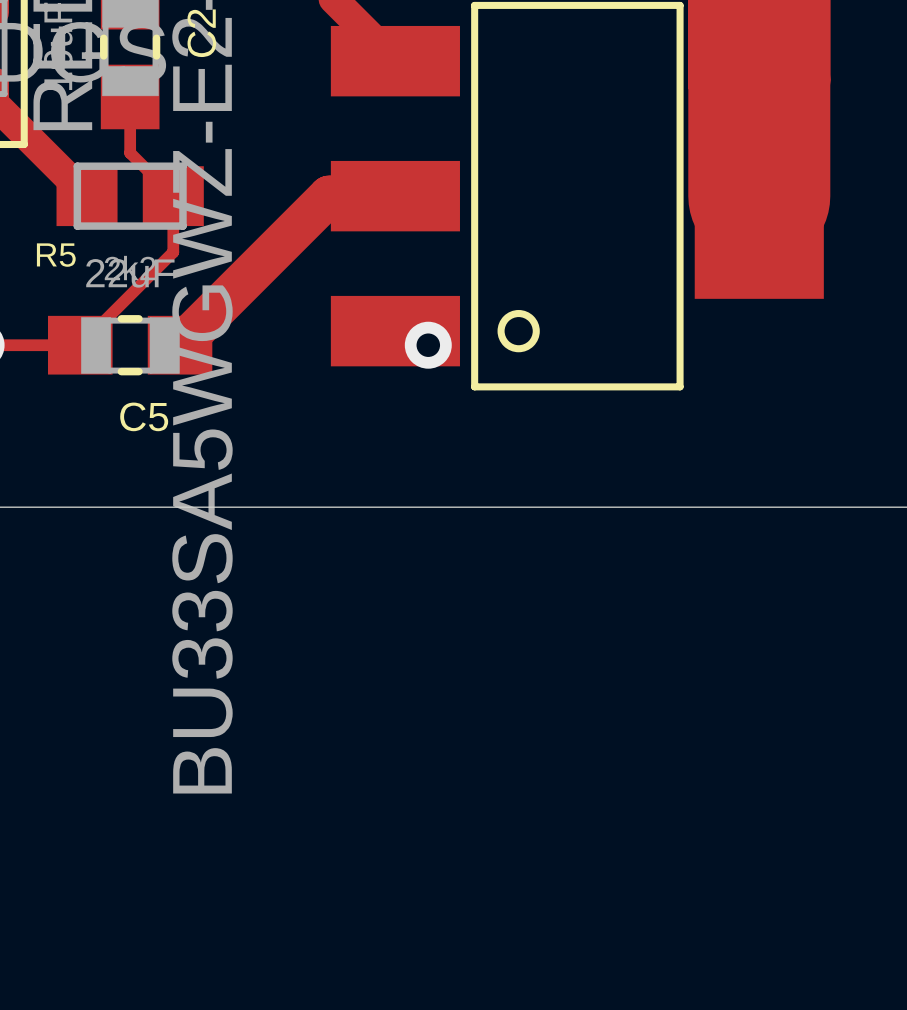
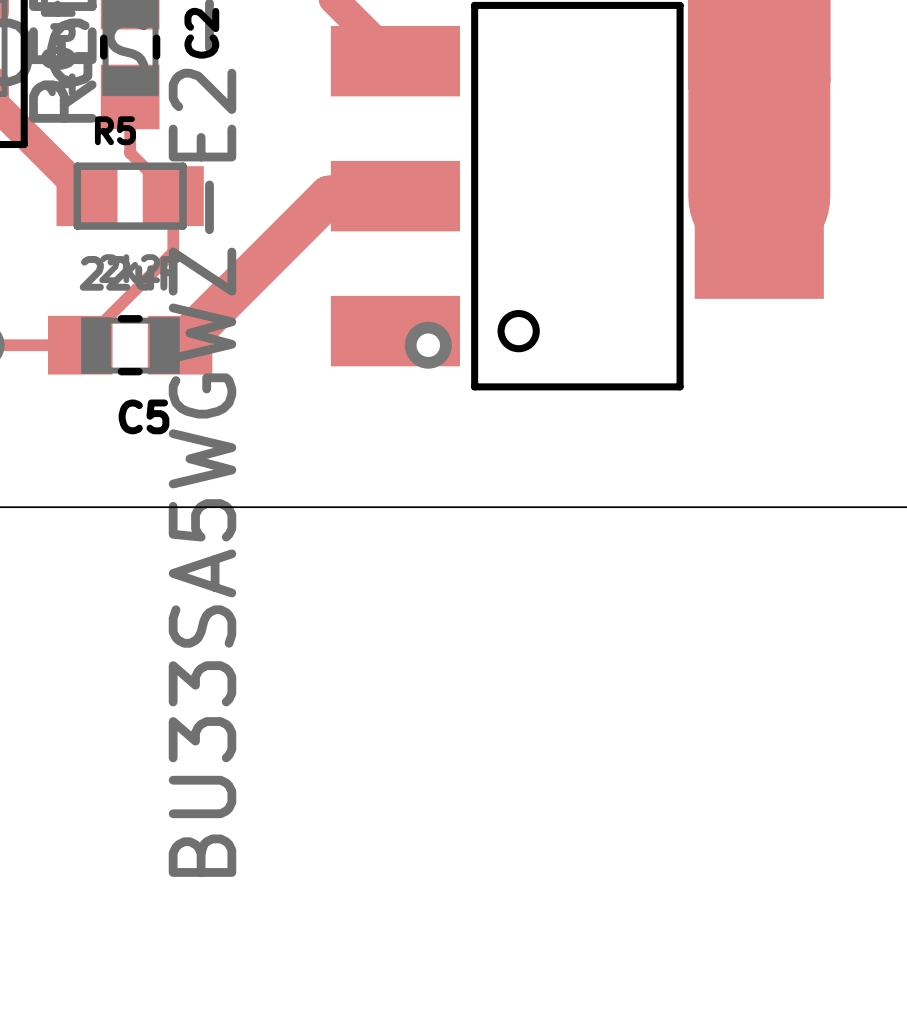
R5 name position: R5 (56, 255) -> R5 (115, 130)

